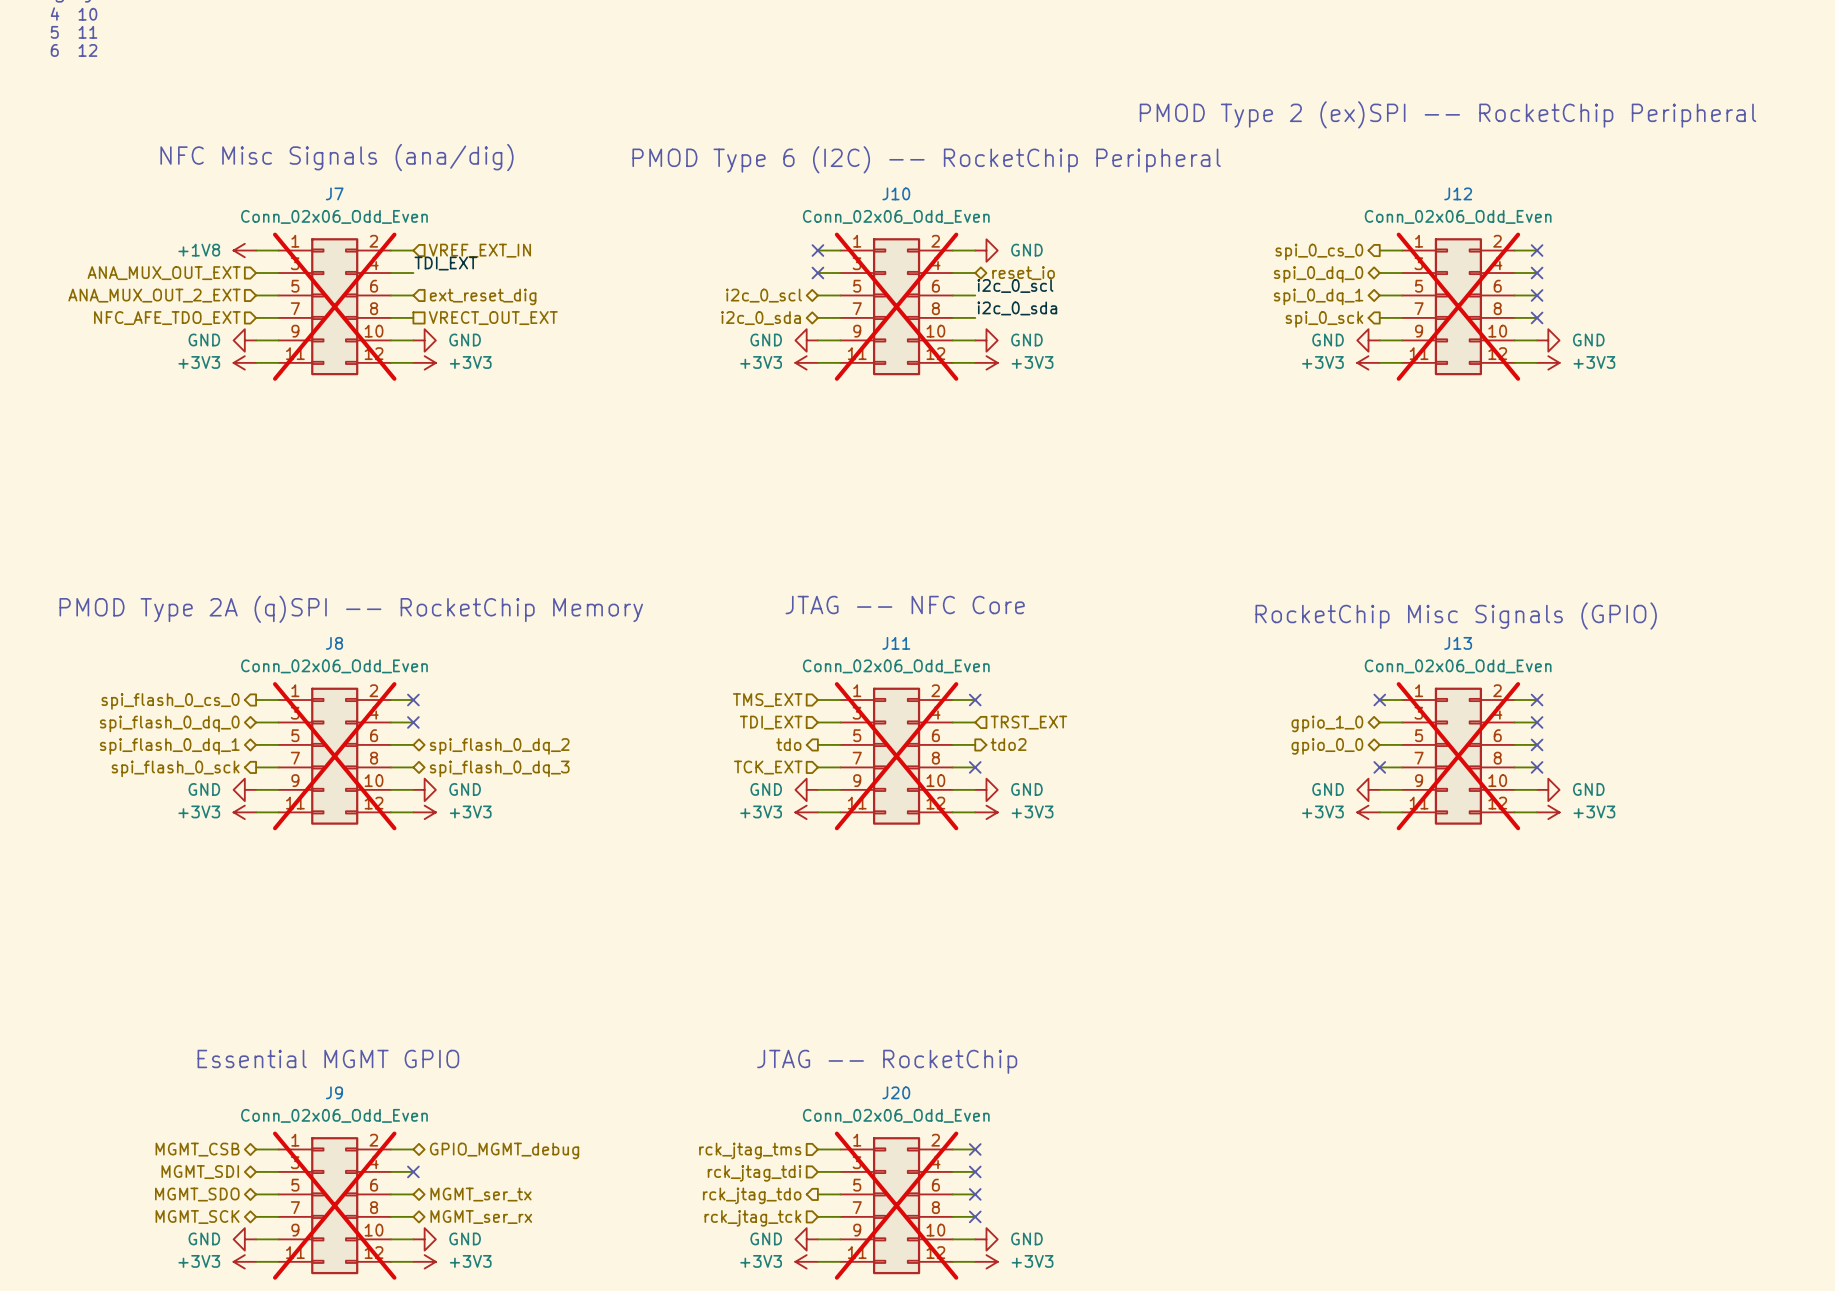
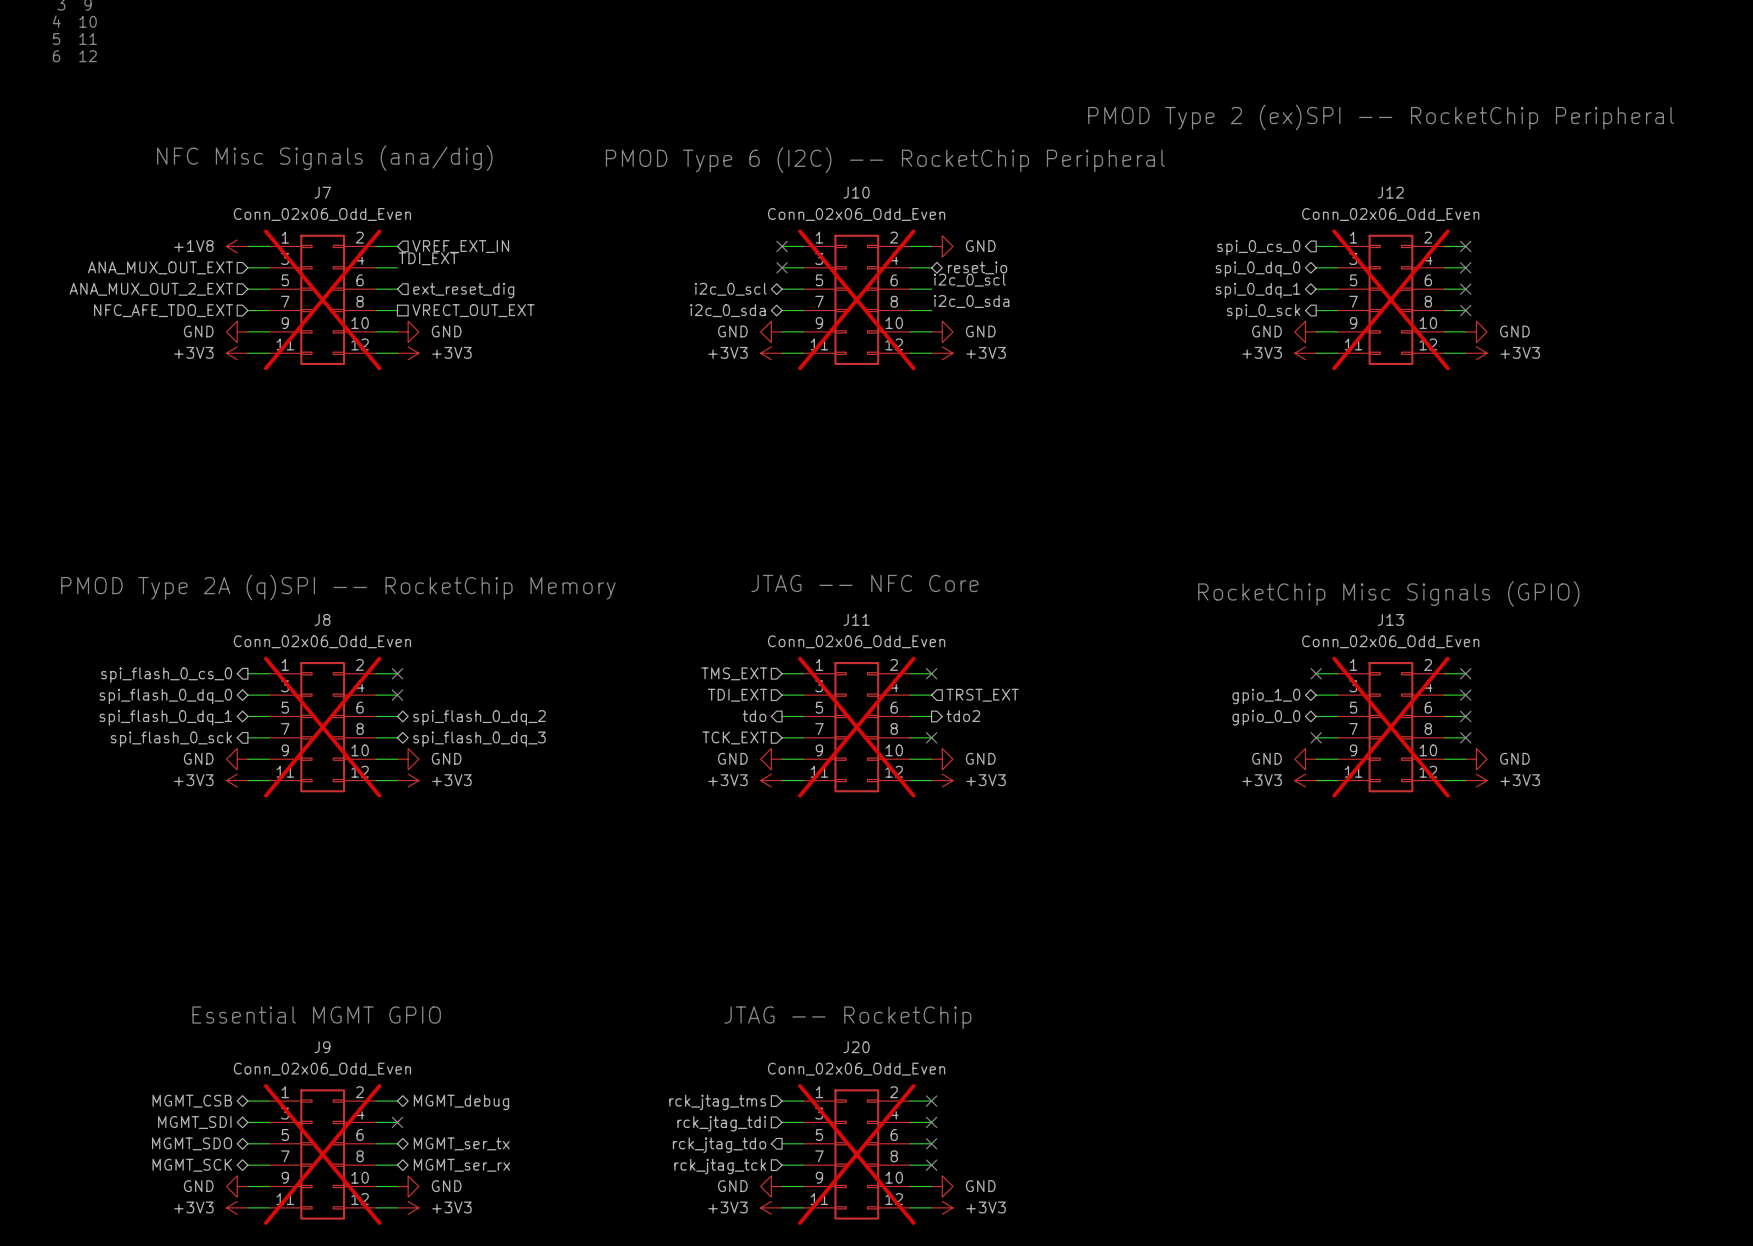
hierarchical label: GPIO_MGMT_debug (504, 1150) -> MGMT_debug (461, 1102)

